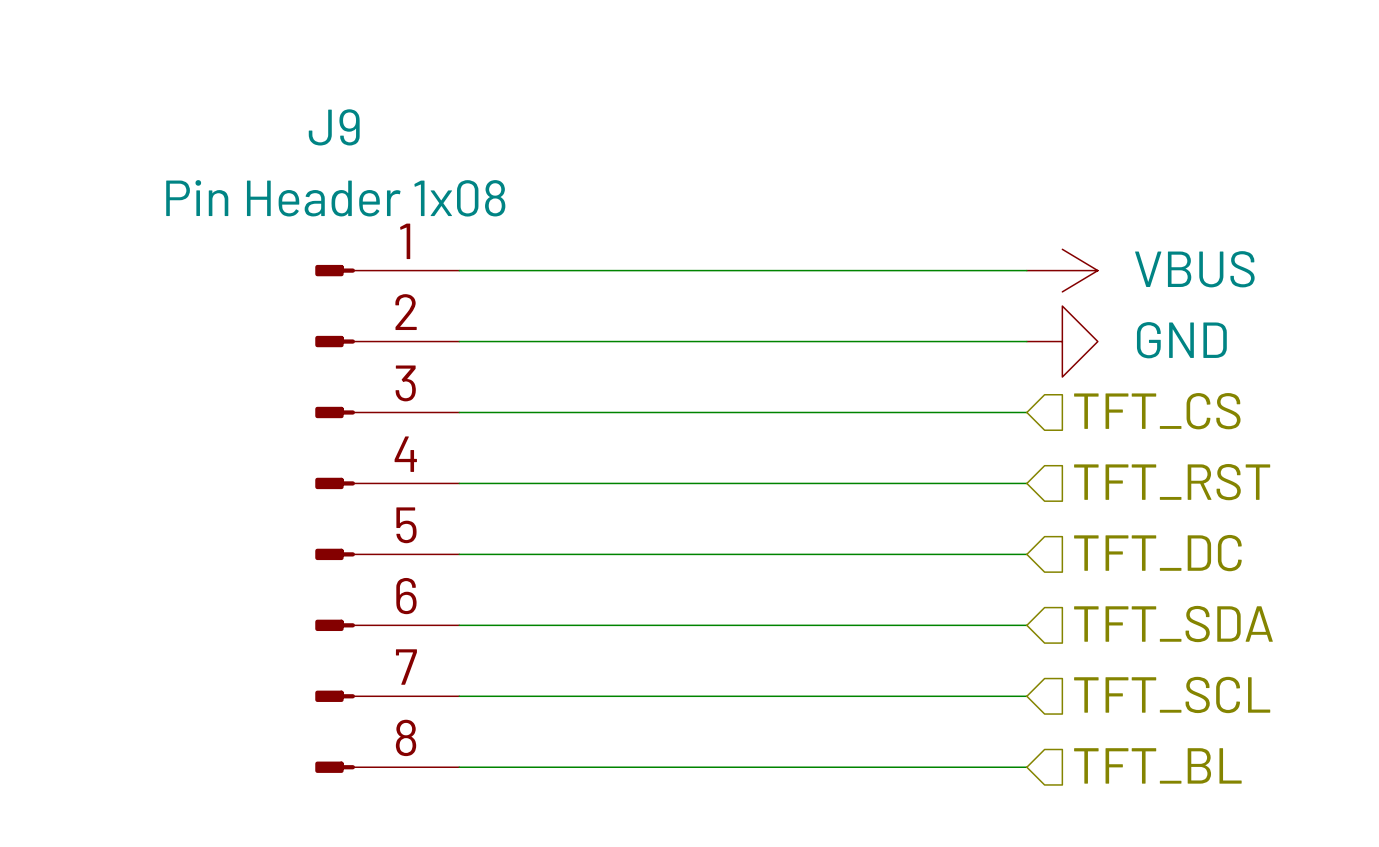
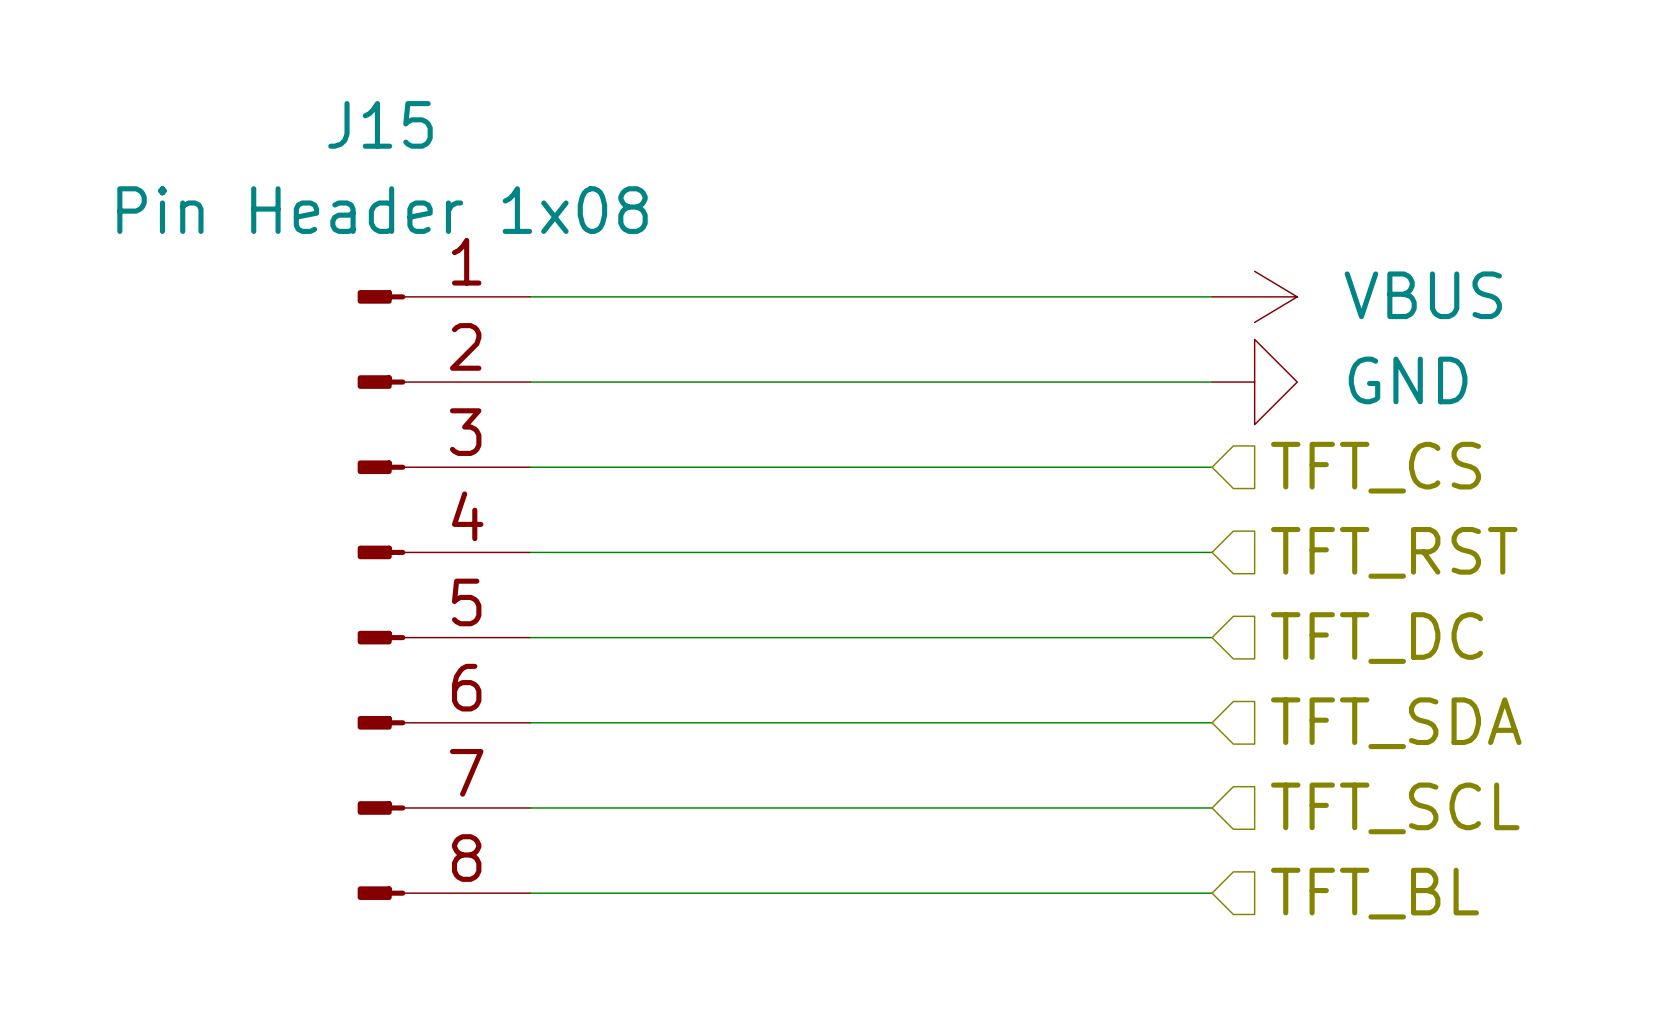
J9 name: J9 (334, 127) -> J15 (380, 124)

